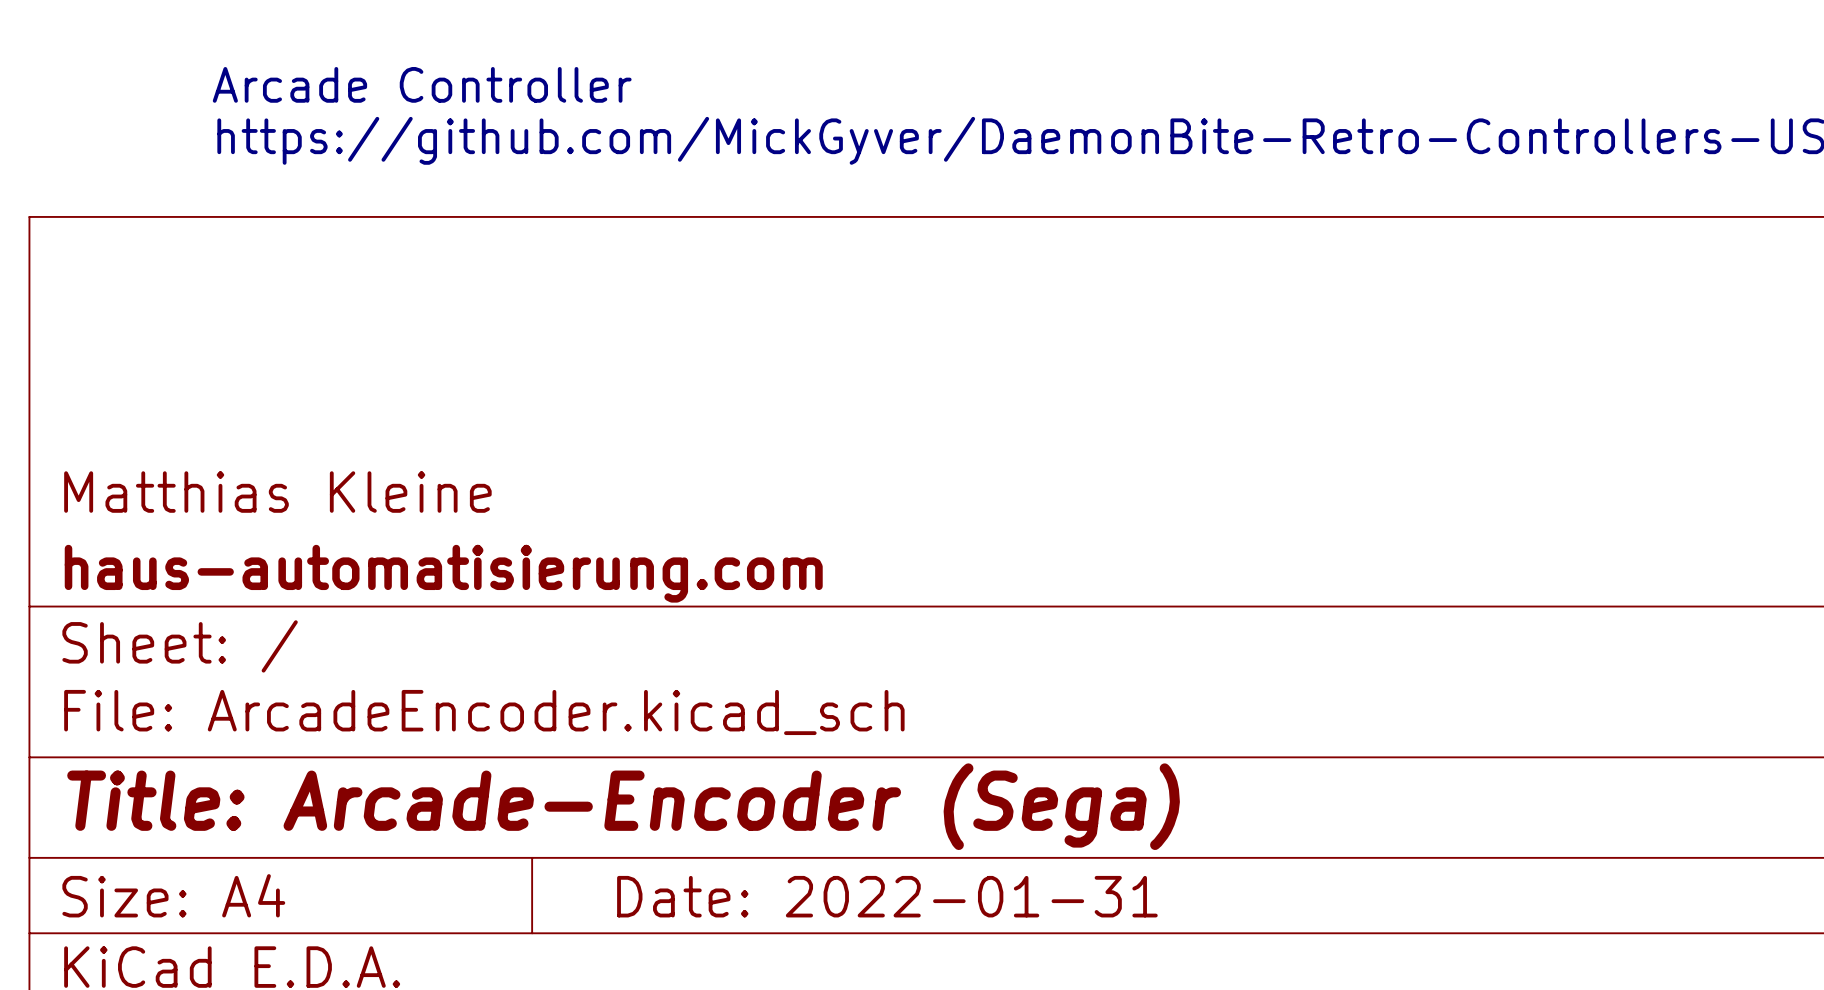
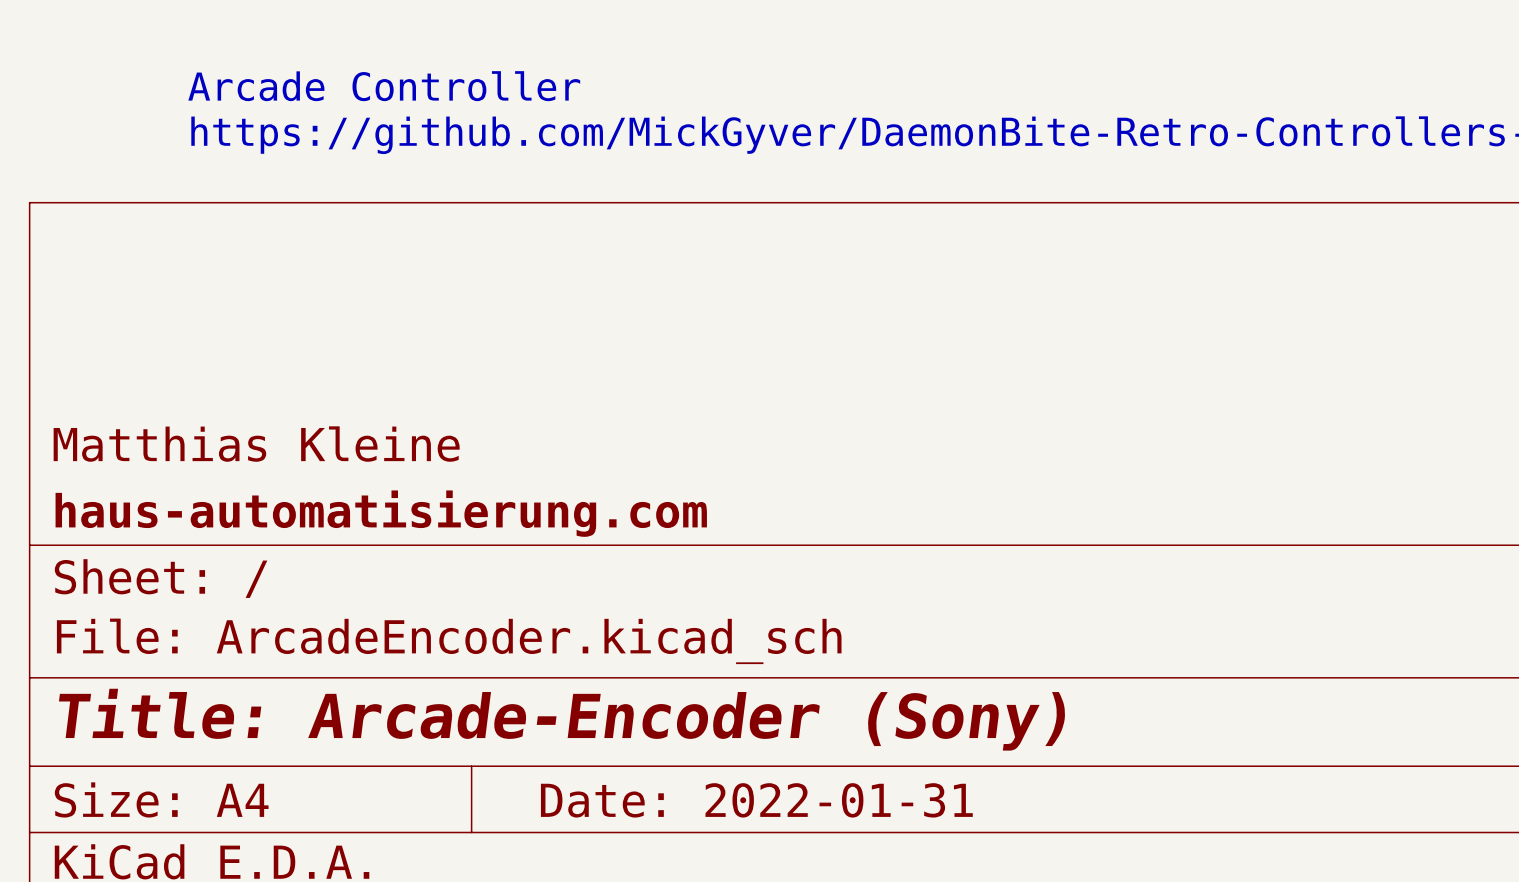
title block: Title: Arcade-Encoder (Sega) (623, 806) -> Title: Arcade-Encoder (Sony) (562, 719)

